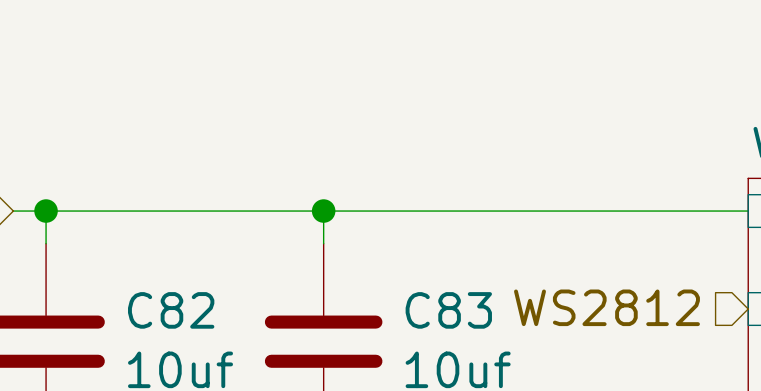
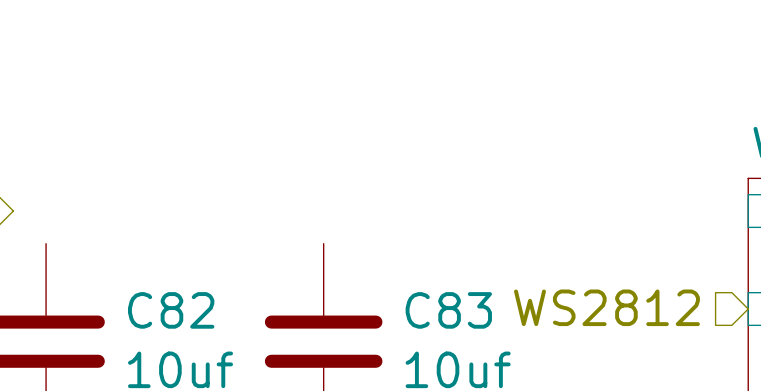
wire: (13, 211) (748, 211) -> none
wire: (46, 211) (46, 243) -> none
junction: (46, 211) -> none
wire: (323, 211) (323, 243) -> none
junction: (323, 211) -> none

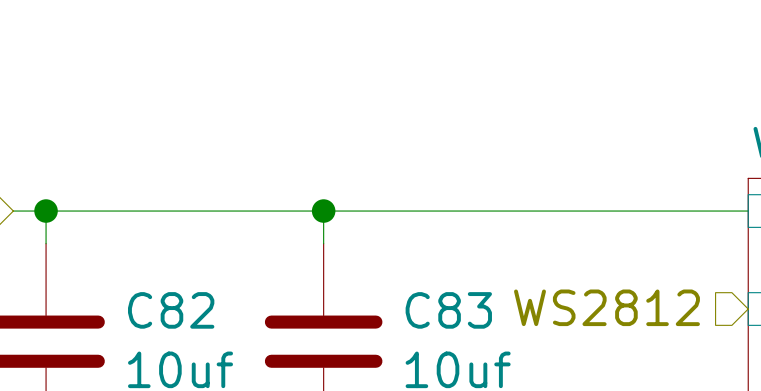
wire: none -> (13, 211) (748, 211)
wire: none -> (46, 211) (46, 243)
junction: none -> (46, 211)
wire: none -> (323, 211) (323, 243)
junction: none -> (323, 211)

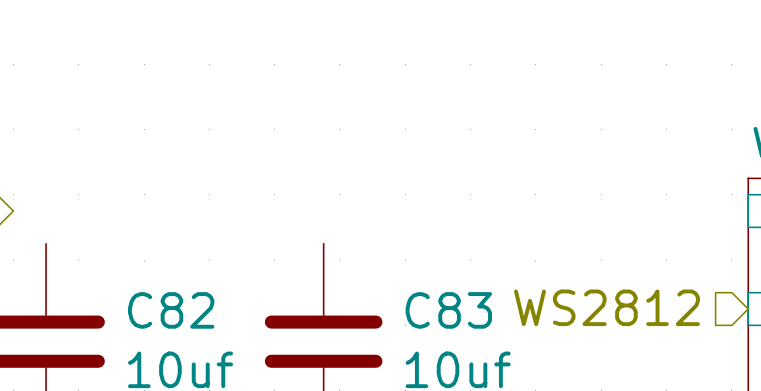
wire: (13, 211) (748, 211) -> none
wire: (46, 211) (46, 243) -> none
junction: (46, 211) -> none
wire: (323, 211) (323, 243) -> none
junction: (323, 211) -> none

